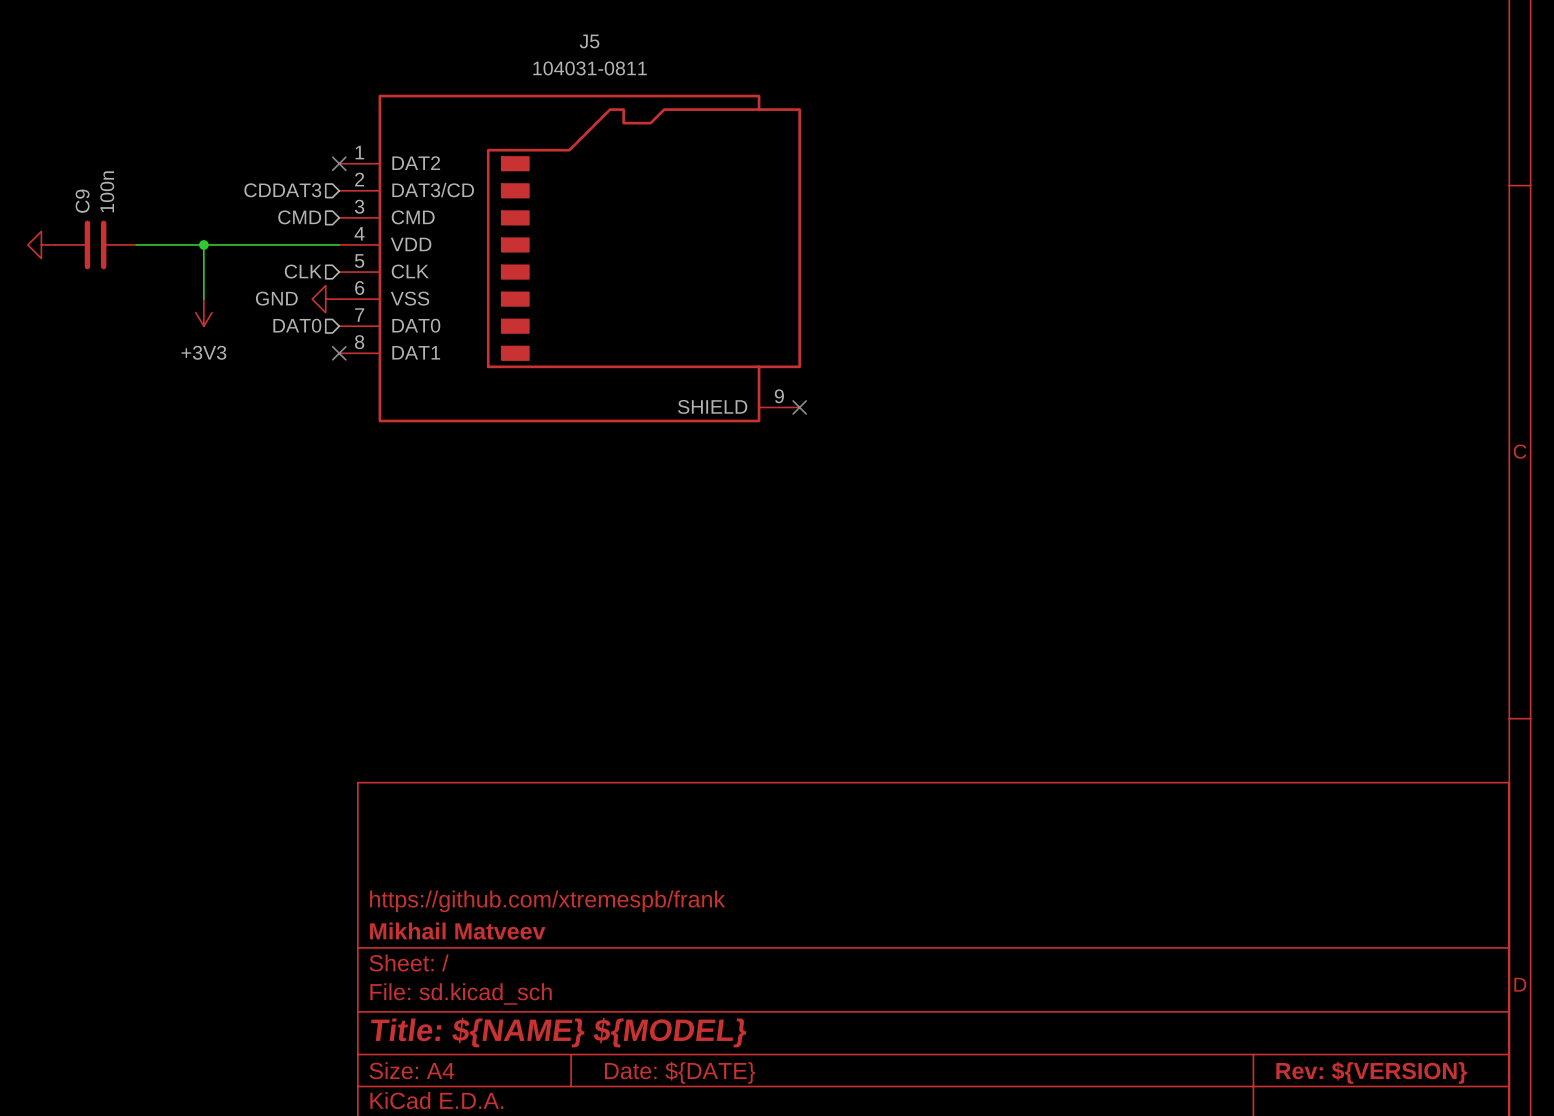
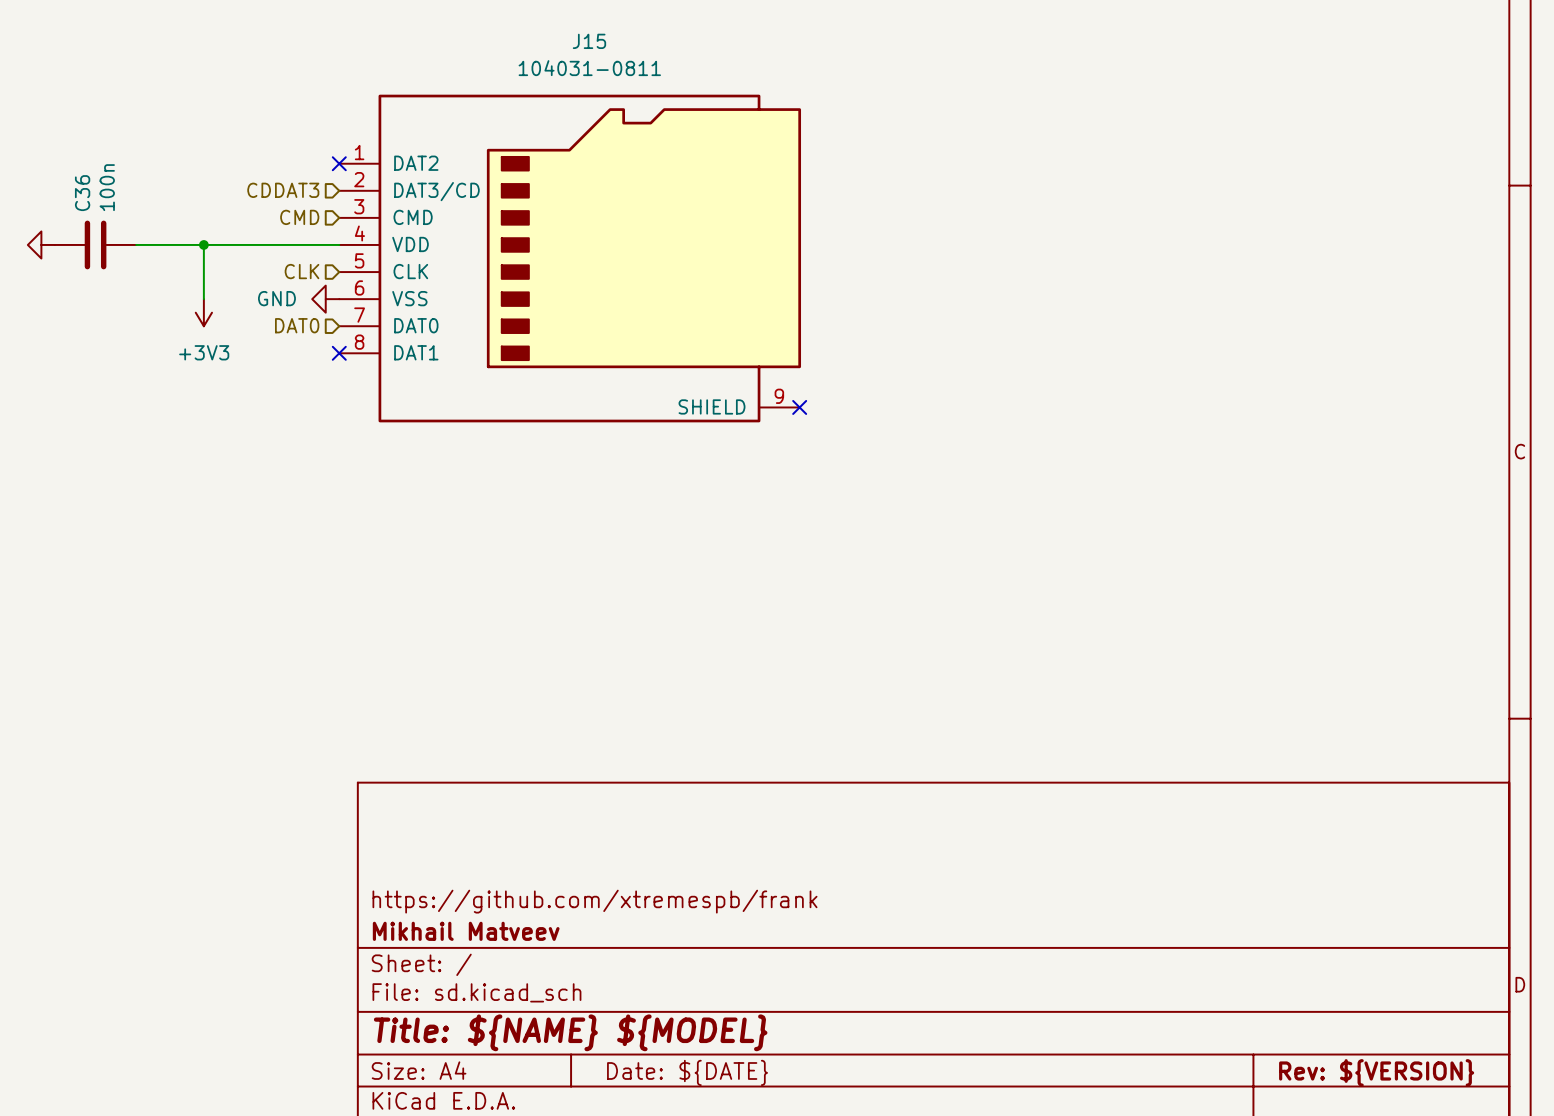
J5 name: J5 (589, 41) -> J15 (589, 41)
C9 name: C9 (82, 201) -> C36 (82, 193)

